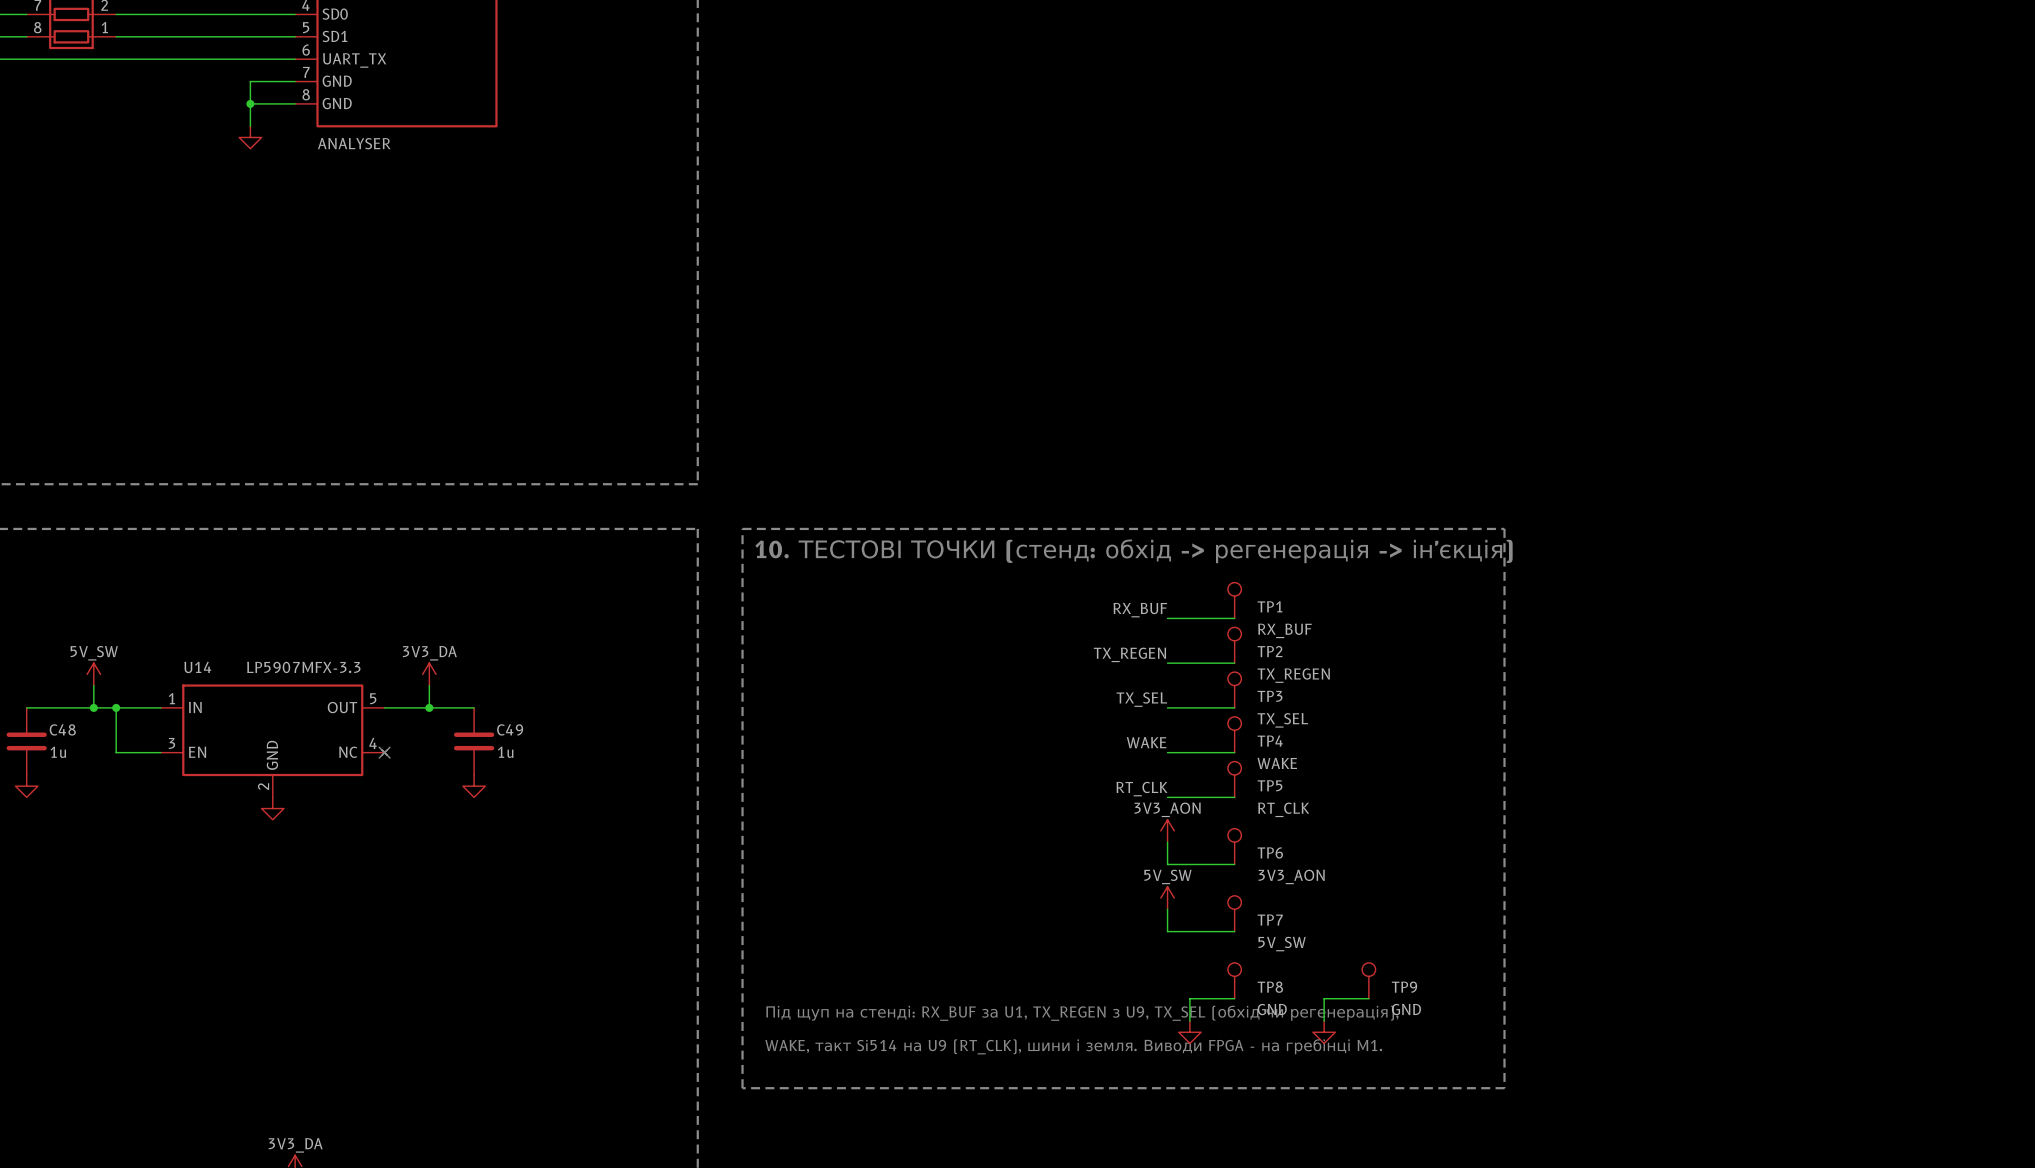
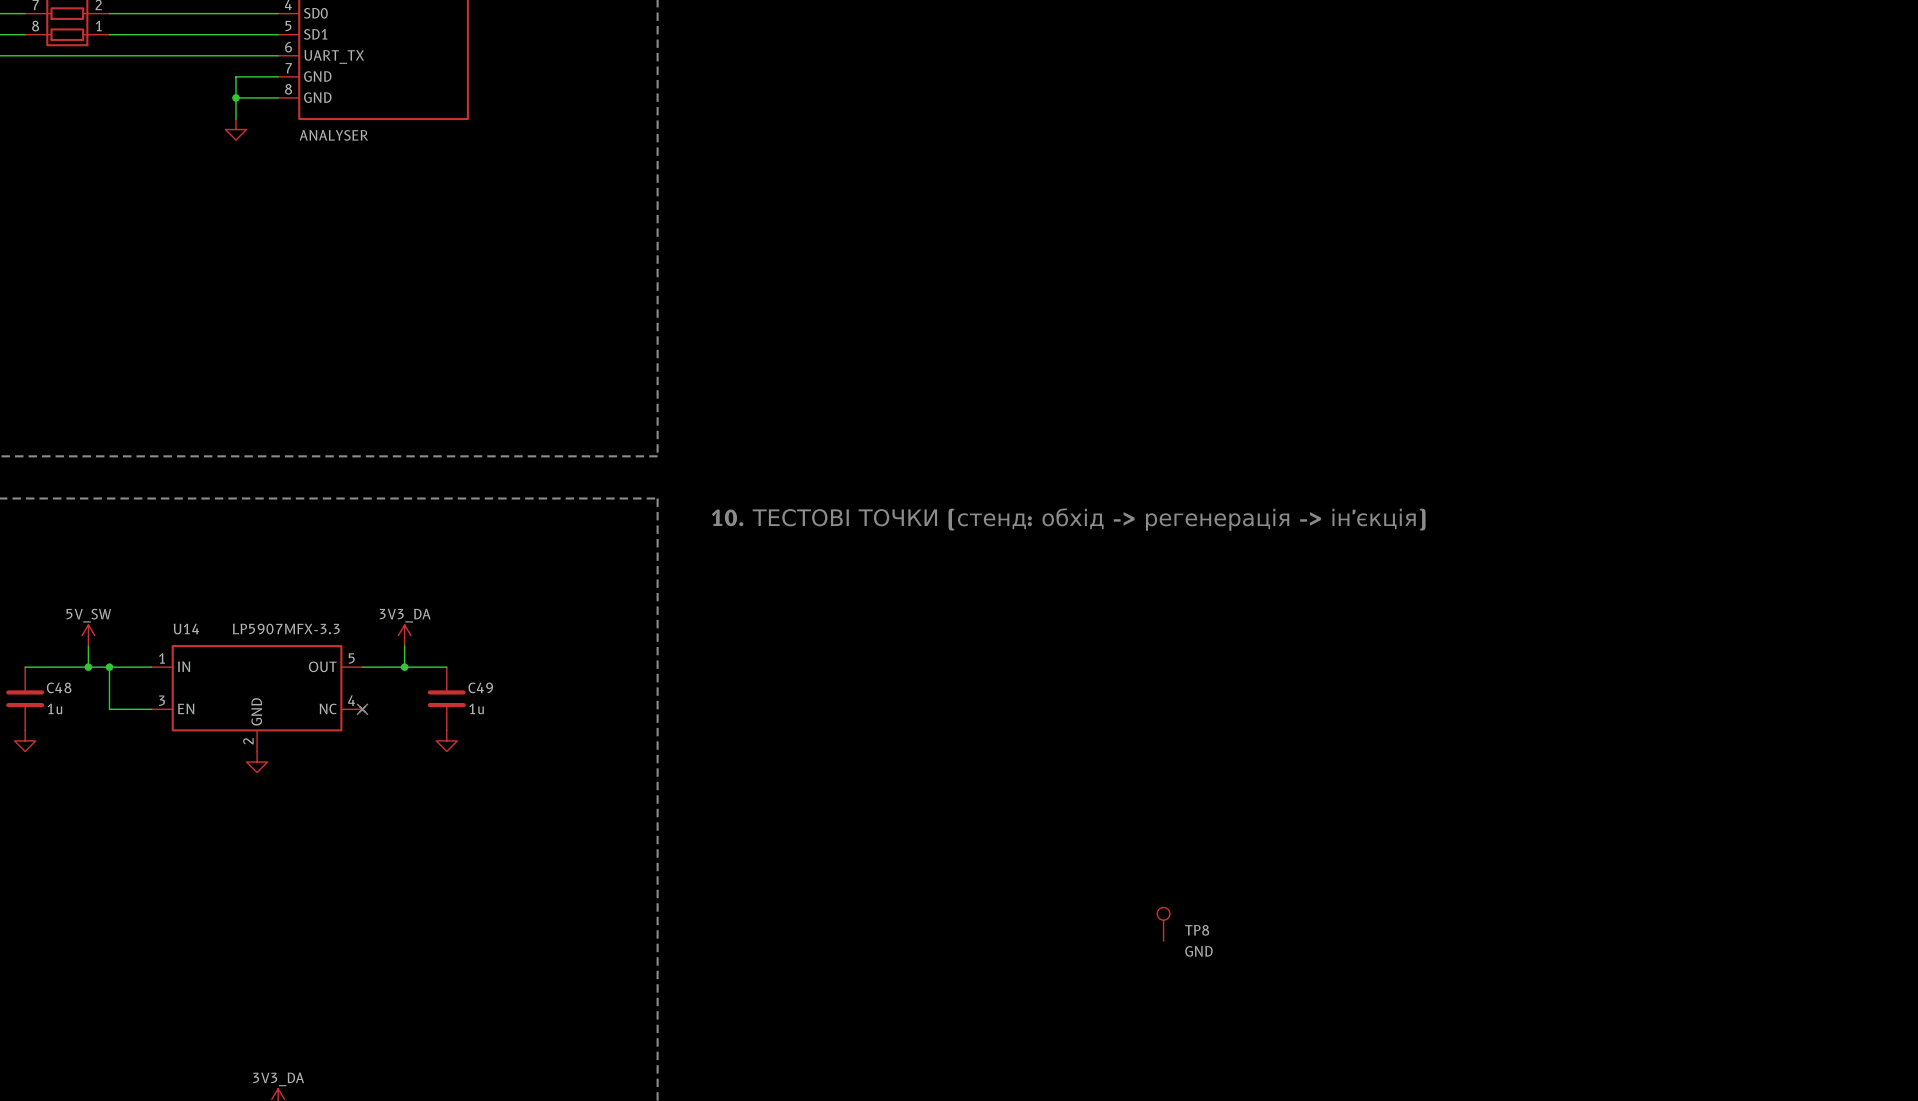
line: (742, 528) (1504, 528) (1504, 1088) (742, 1088) (742, 528) -> none
TP1: RX_BUF (1234, 600) -> none
label: RX_BUF (1140, 610) -> none
wire: (1167, 618) (1234, 618) -> none
TP2: TX_REGEN (1234, 645) -> none
label: TX_REGEN (1129, 654) -> none
wire: (1167, 663) (1234, 663) -> none
TP3: TX_SEL (1234, 690) -> none
label: TX_SEL (1141, 699) -> none
wire: (1167, 707) (1234, 707) -> none
TP4: WAKE (1234, 734) -> none
label: WAKE (1146, 742) -> none
wire: (1167, 752) (1234, 752) -> none
TP5: RT_CLK (1234, 779) -> none
label: RT_CLK (1141, 789) -> none
wire: (1167, 797) (1234, 797) -> none
power symbol: 3V3_AON (1167, 830) -> none
wire: (1167, 842) (1167, 864) (1234, 864) -> none
TP6: 3V3_AON (1234, 846) -> none
power symbol: 5V_SW (1167, 898) -> none
wire: (1167, 909) (1167, 931) (1234, 931) -> none
TP7: 5V_SW (1234, 913) -> none
TP9: GND (1368, 980) -> none
wire: (1234, 998) (1189, 998) (1189, 1021) -> none
wire: (1368, 998) (1324, 998) (1324, 1021) -> none
text: Під щуп на стенді: RX_BUF за U1, TX_REGEN з U9, TX_SEL (обхід чи регенерація), (1082, 1013) -> none
power symbol: (1189, 1032) -> none
power symbol: (1324, 1032) -> none
text: WAKE, такт Si514 на U9 (RT_CLK), шини і земля. Виводи FPGA - на гребінці M1. (1073, 1046) -> none

